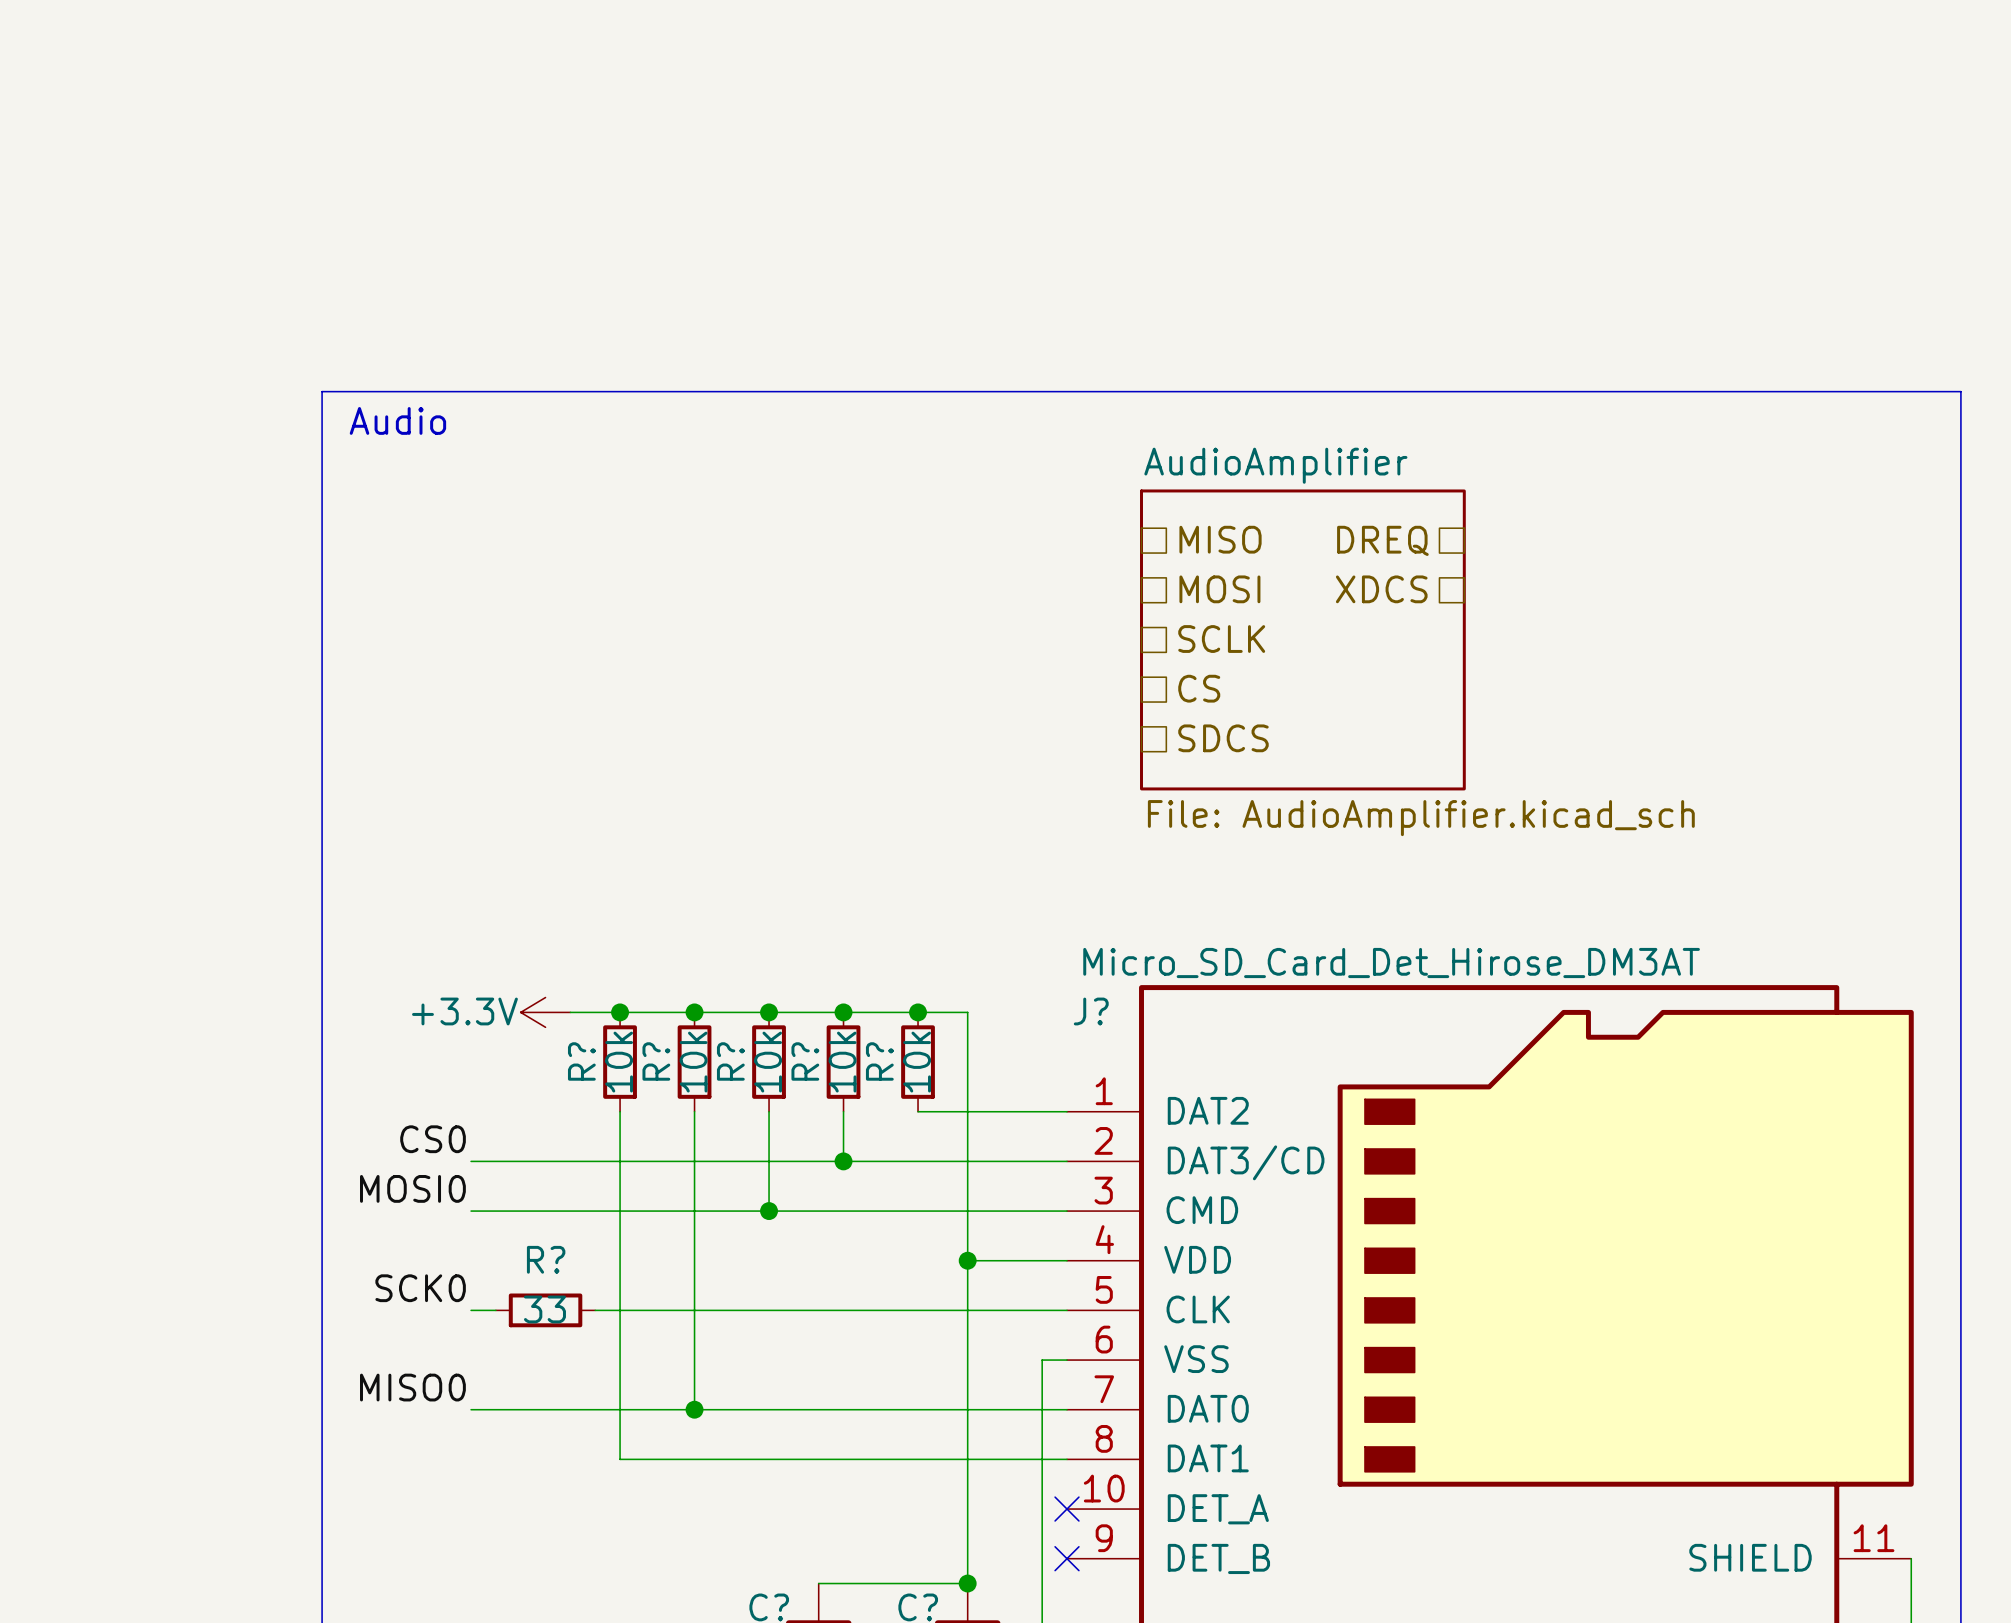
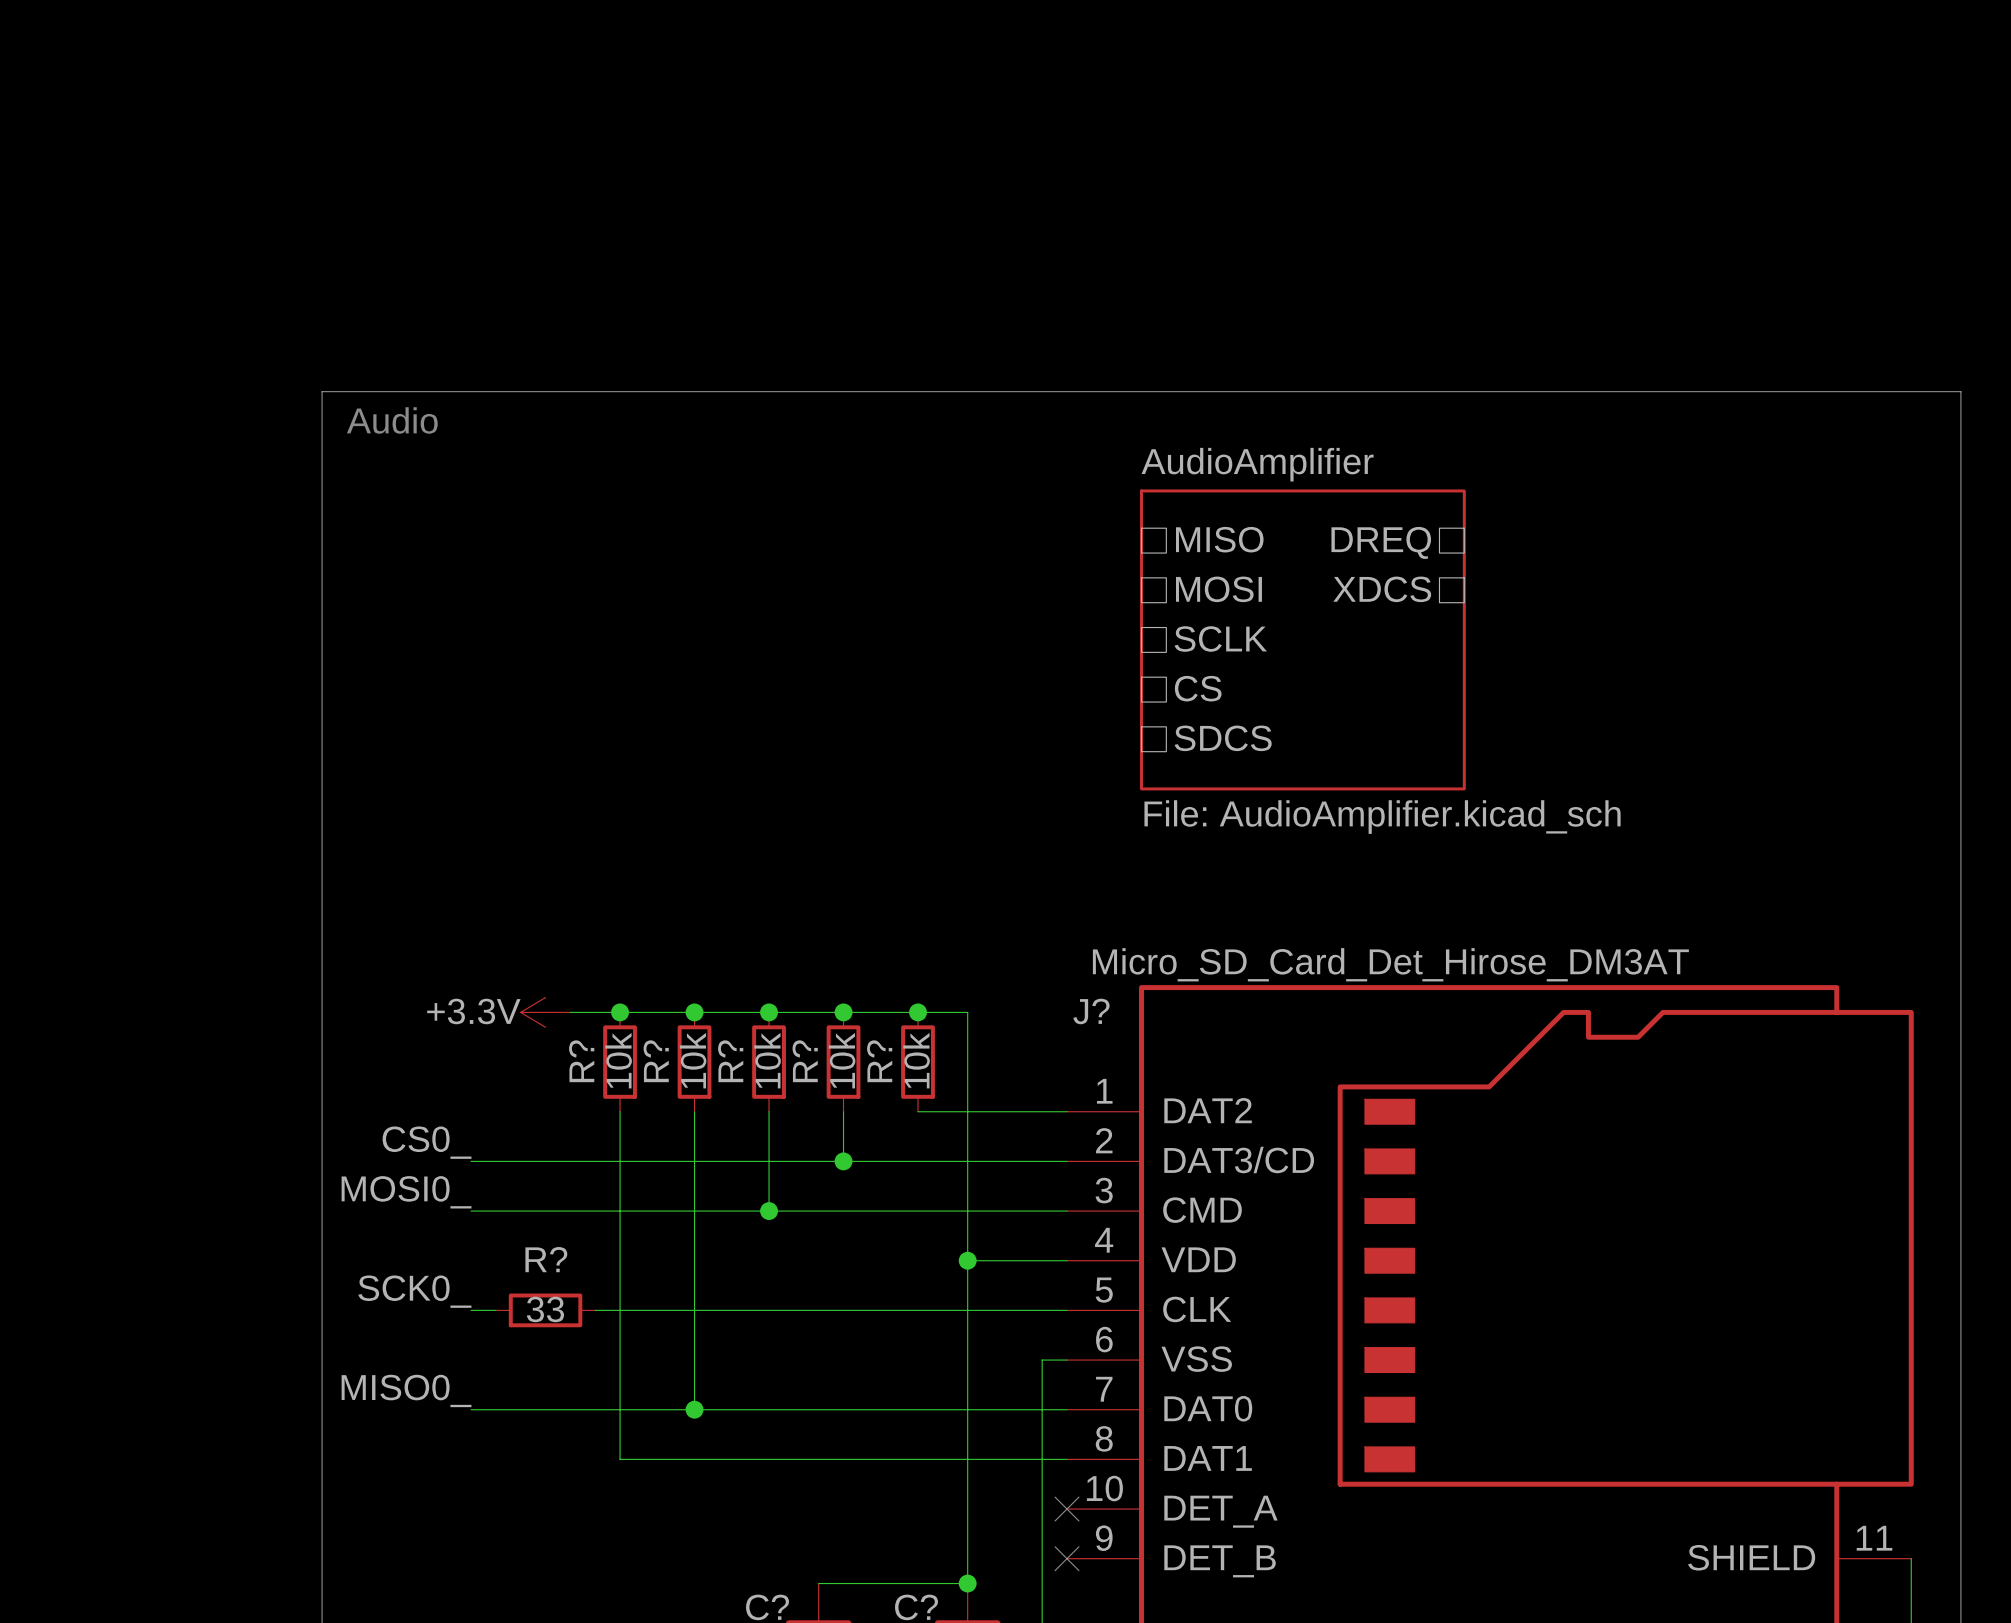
label: CS0 (433, 1139) -> CS0_ (427, 1142)
label: MOSI0 (412, 1188) -> MOSI0_ (406, 1192)
label: SCK0 (420, 1288) -> SCK0_ (414, 1291)
label: MISO0 (412, 1387) -> MISO0_ (406, 1390)

